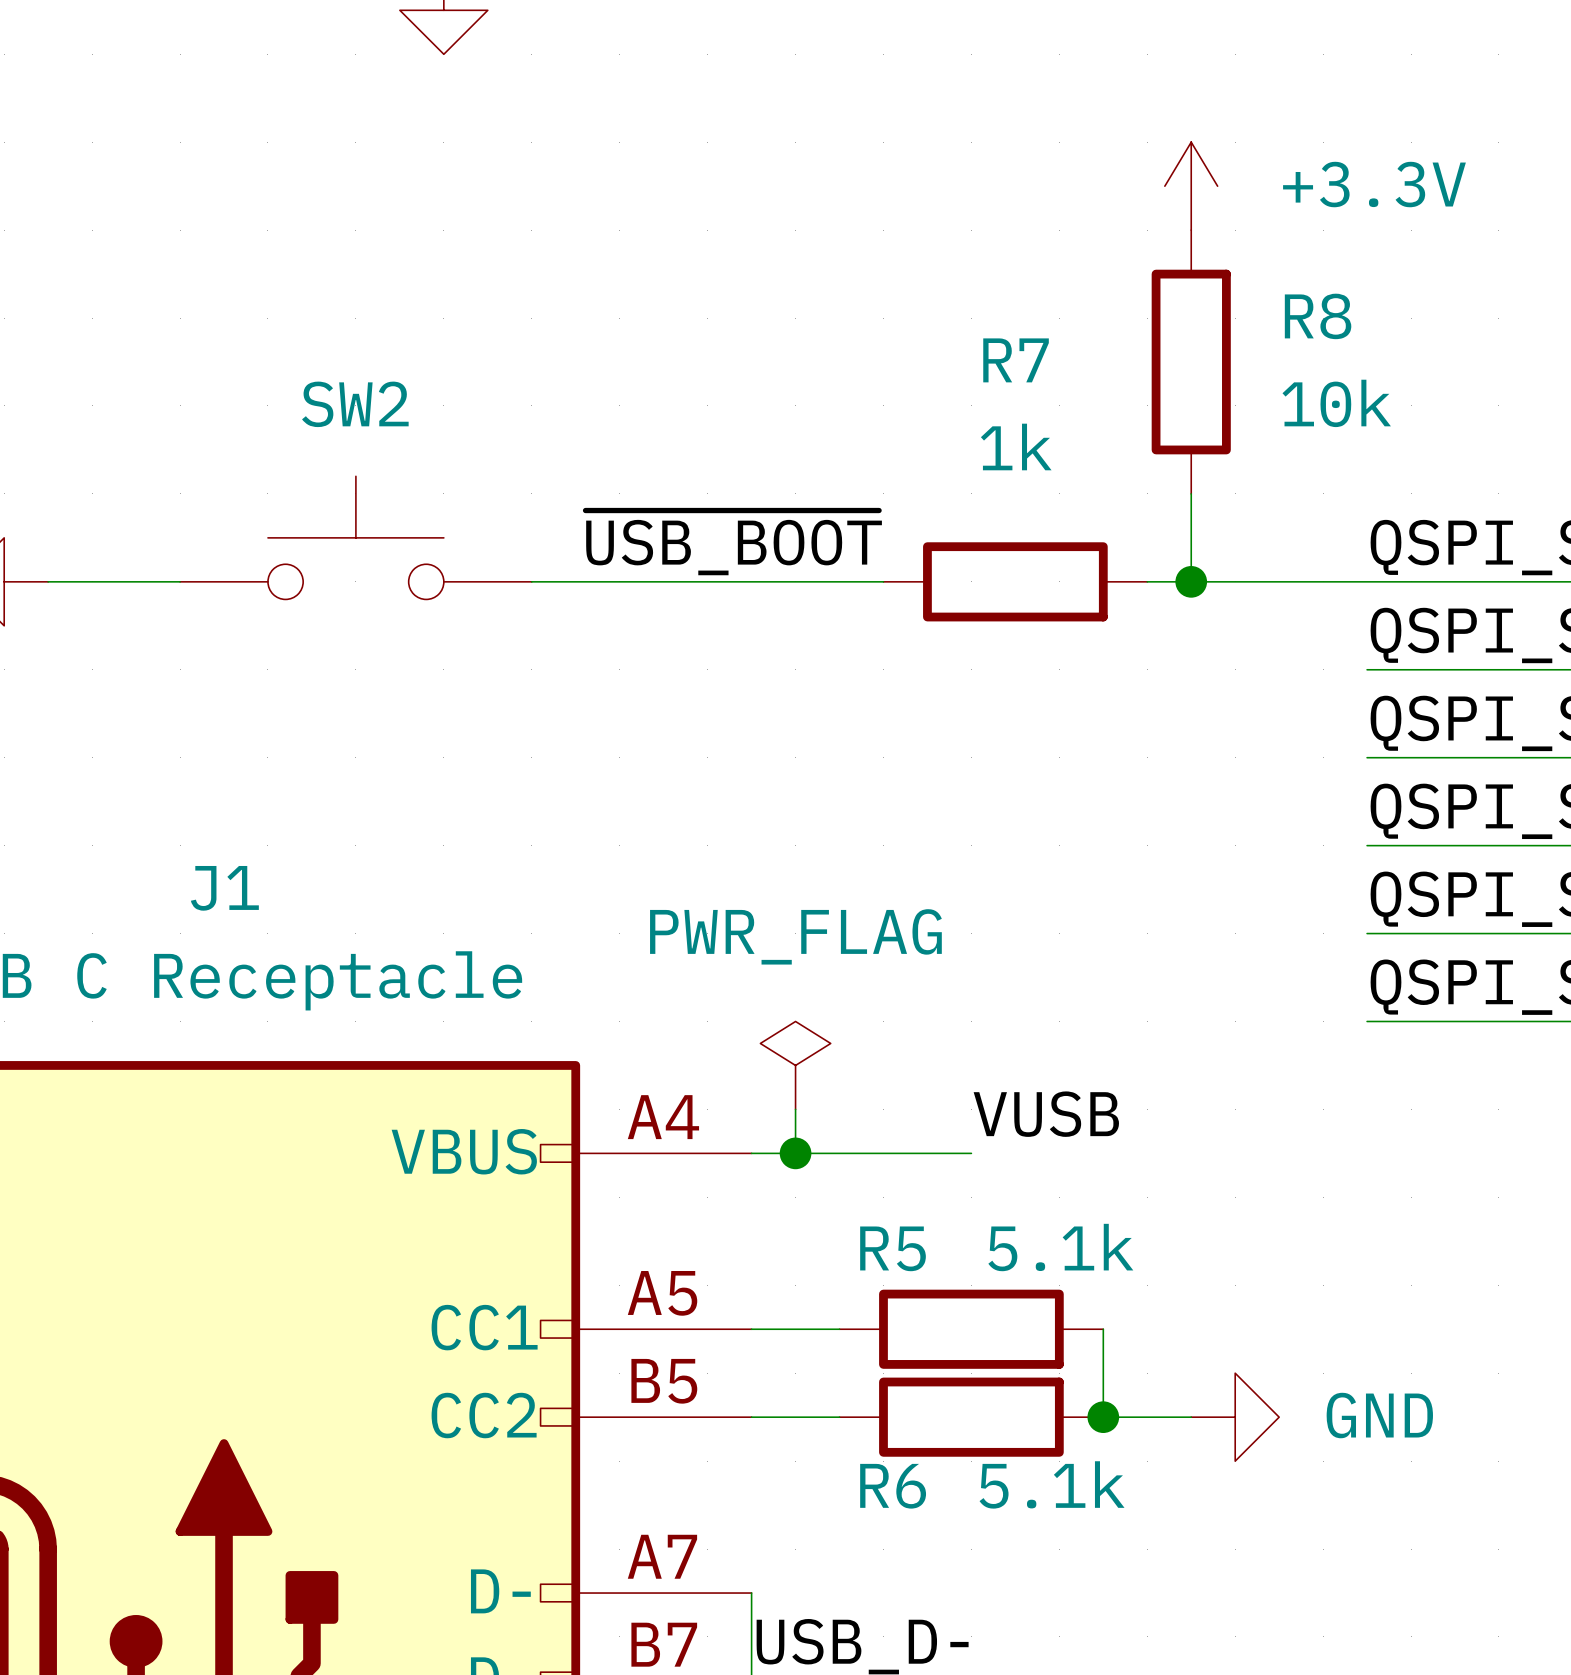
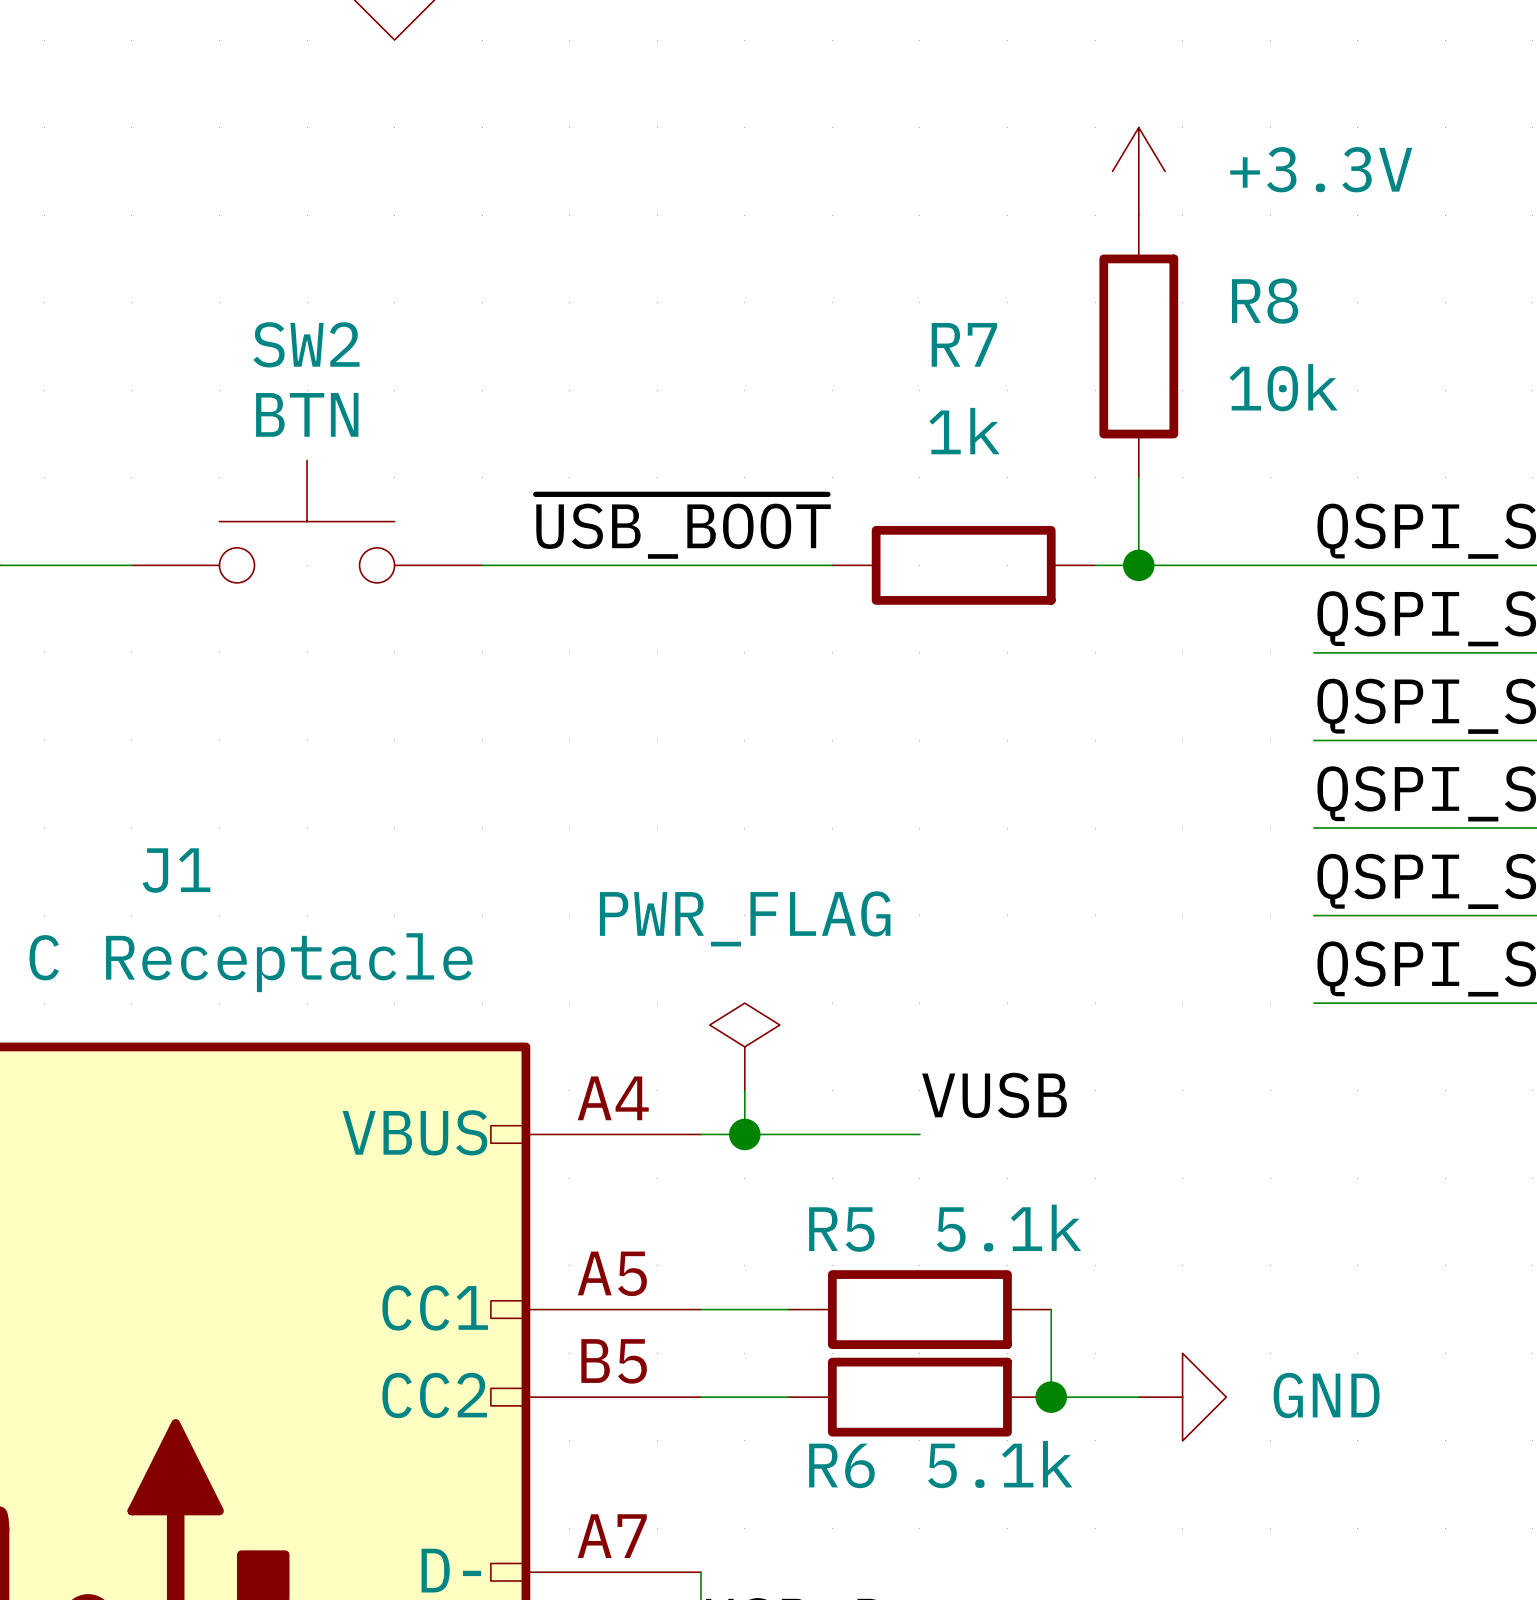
SW2 name position: SW2 (355, 404) -> SW2 (306, 344)
SW2 value: none -> BTN (307, 414)

